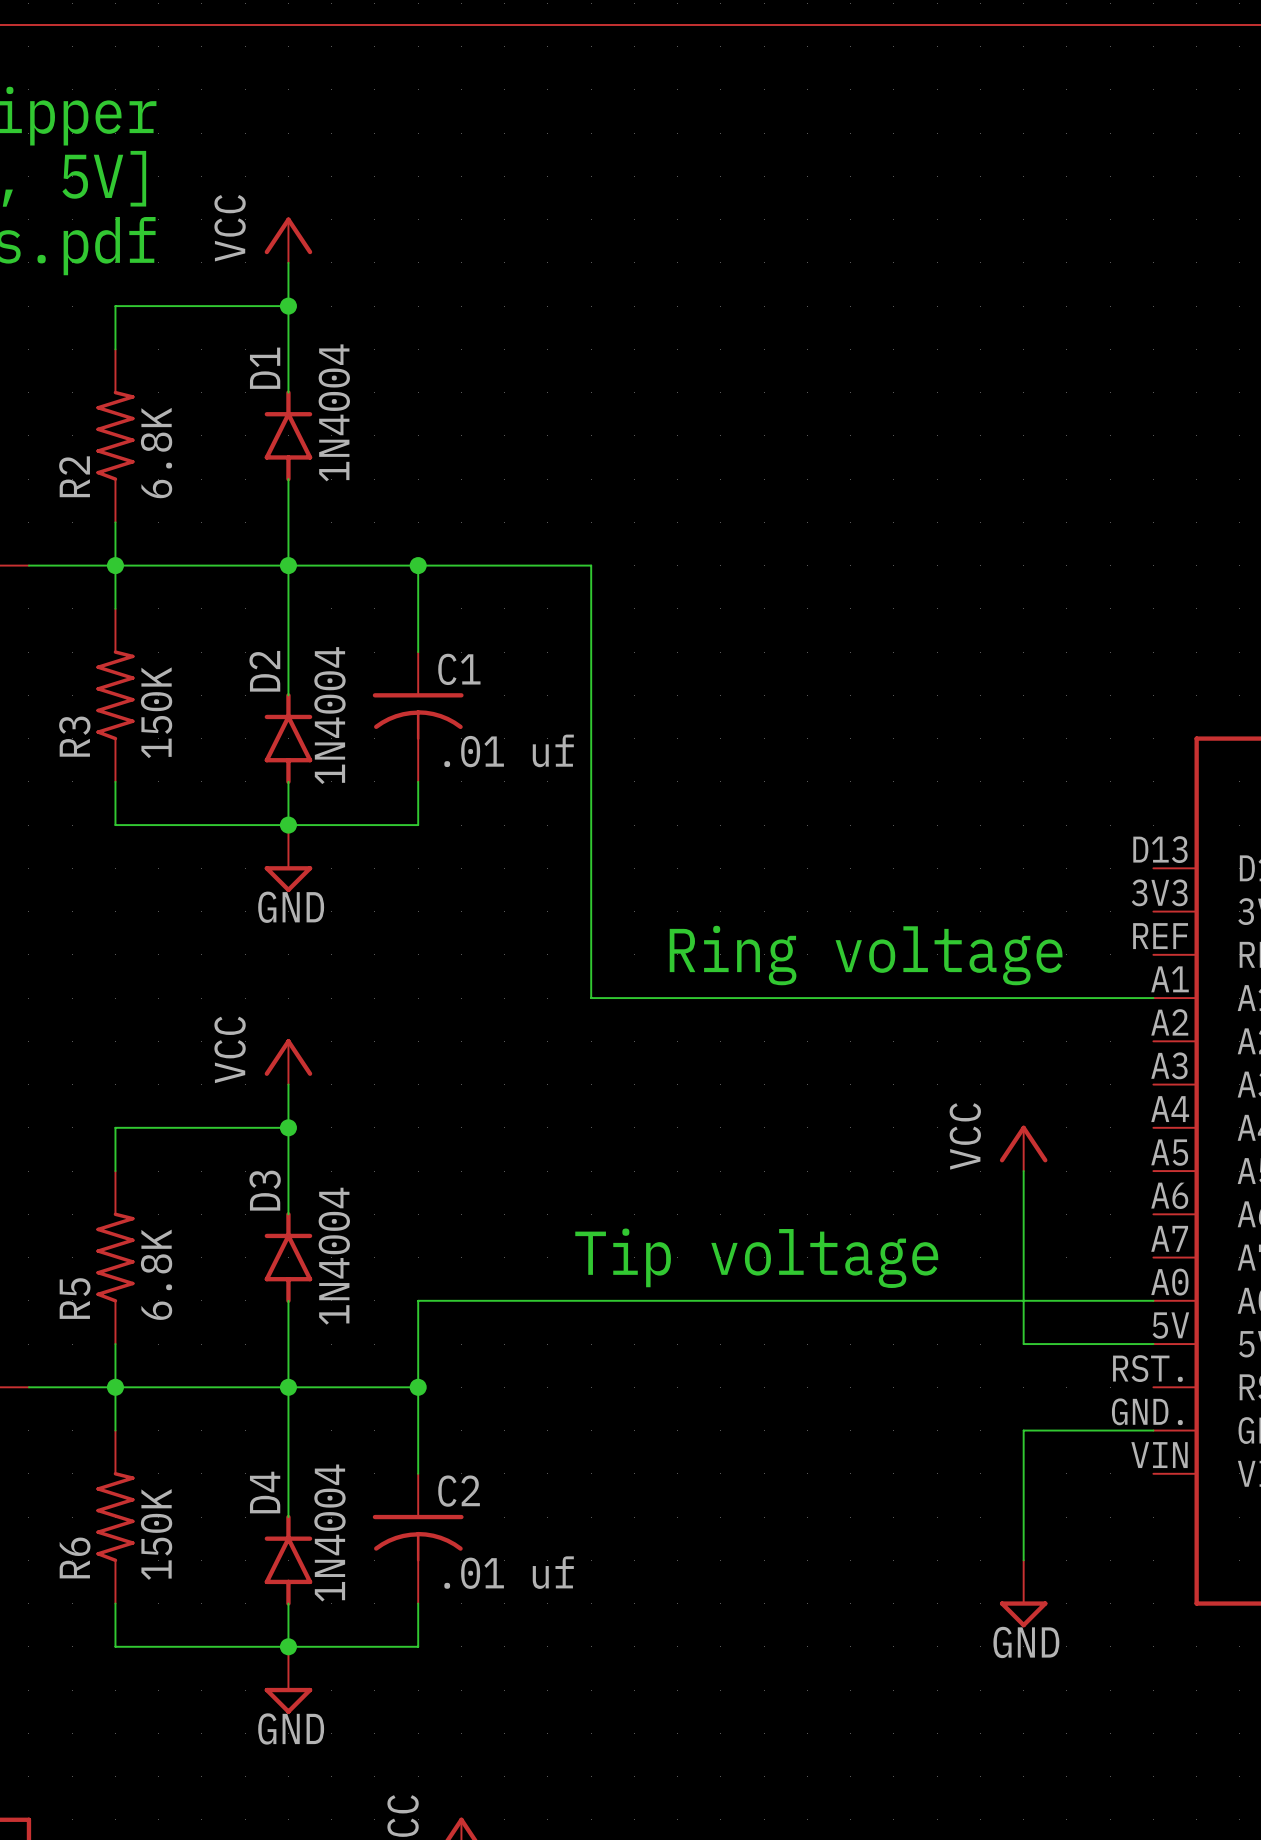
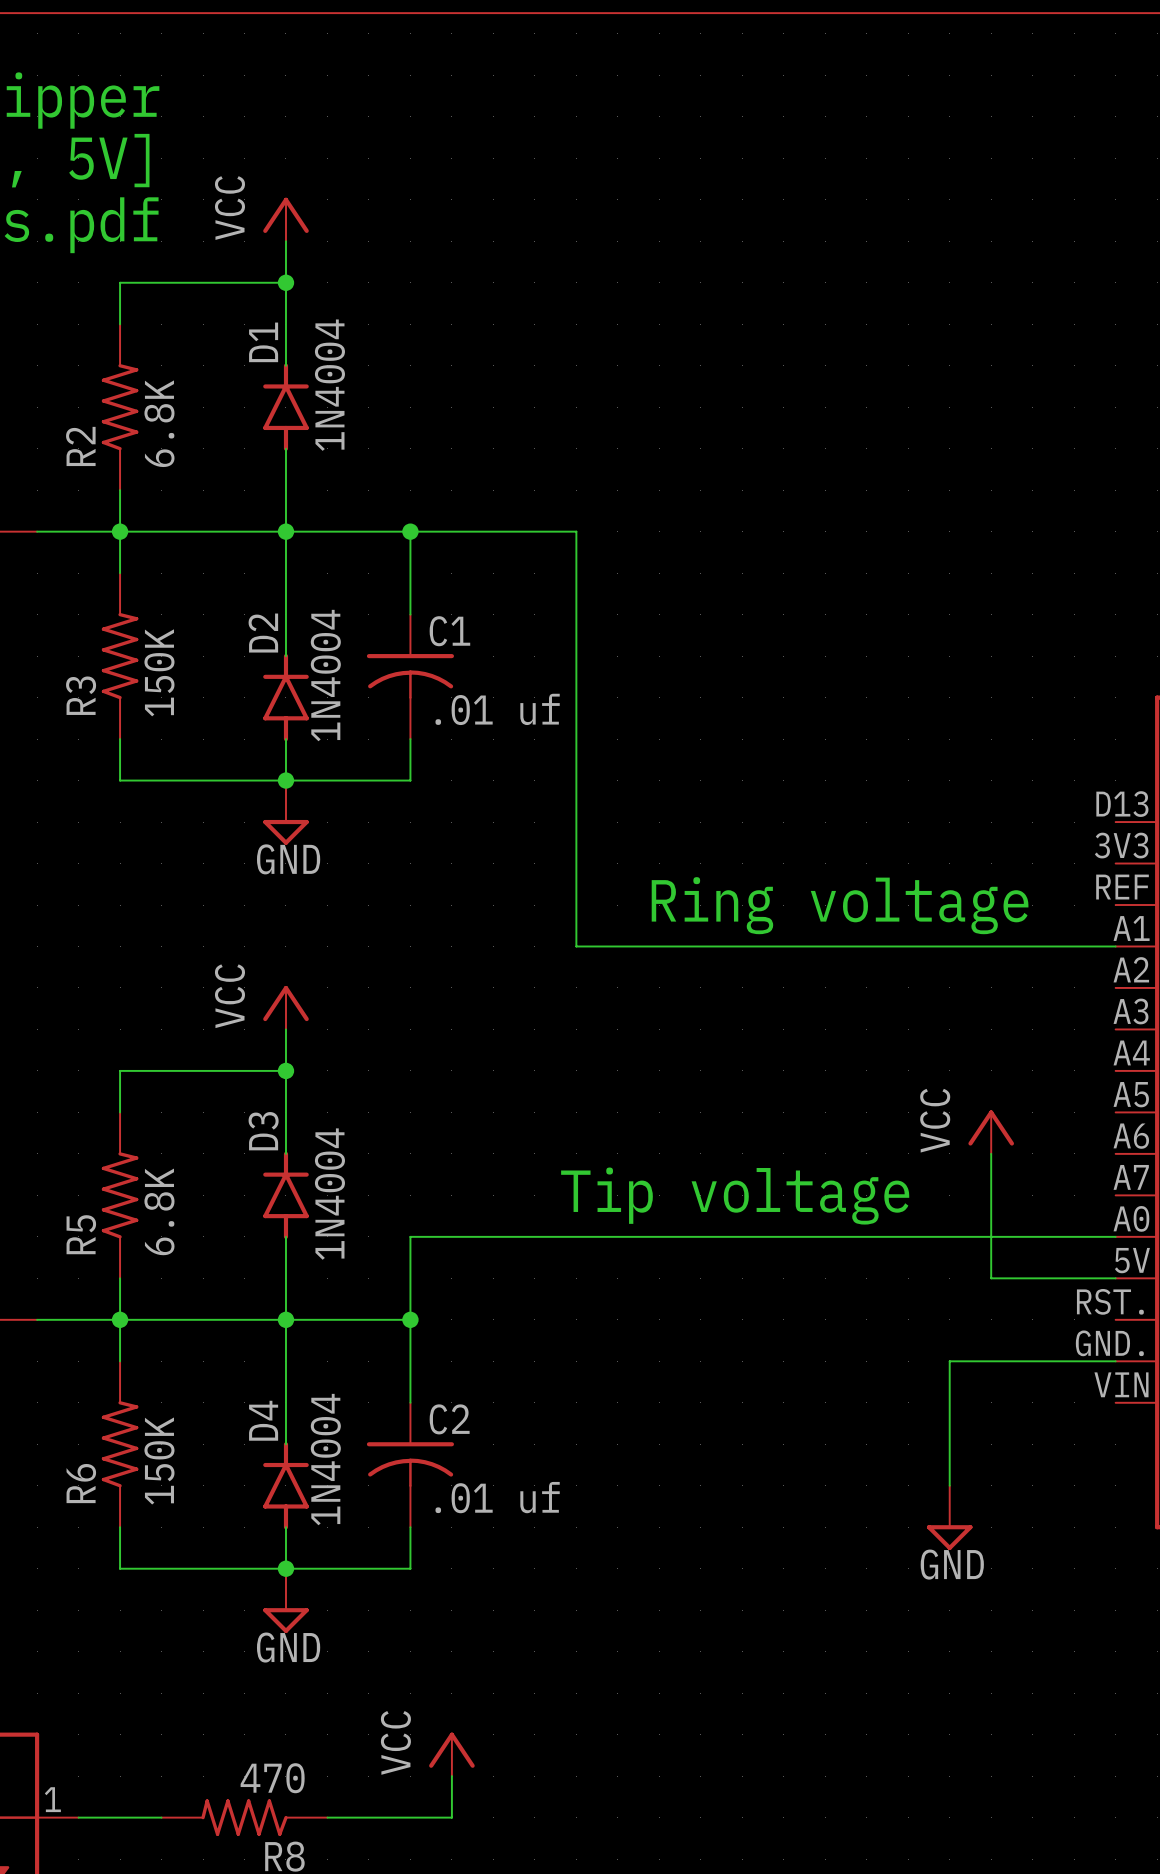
power symbol position: VCC (1023, 1148) -> VCC (991, 1132)
wire: (1023, 1430) (1023, 1560) -> (991, 1361) (949, 1361) (949, 1485)
power symbol position: GND (1023, 1593) -> GND (949, 1517)

